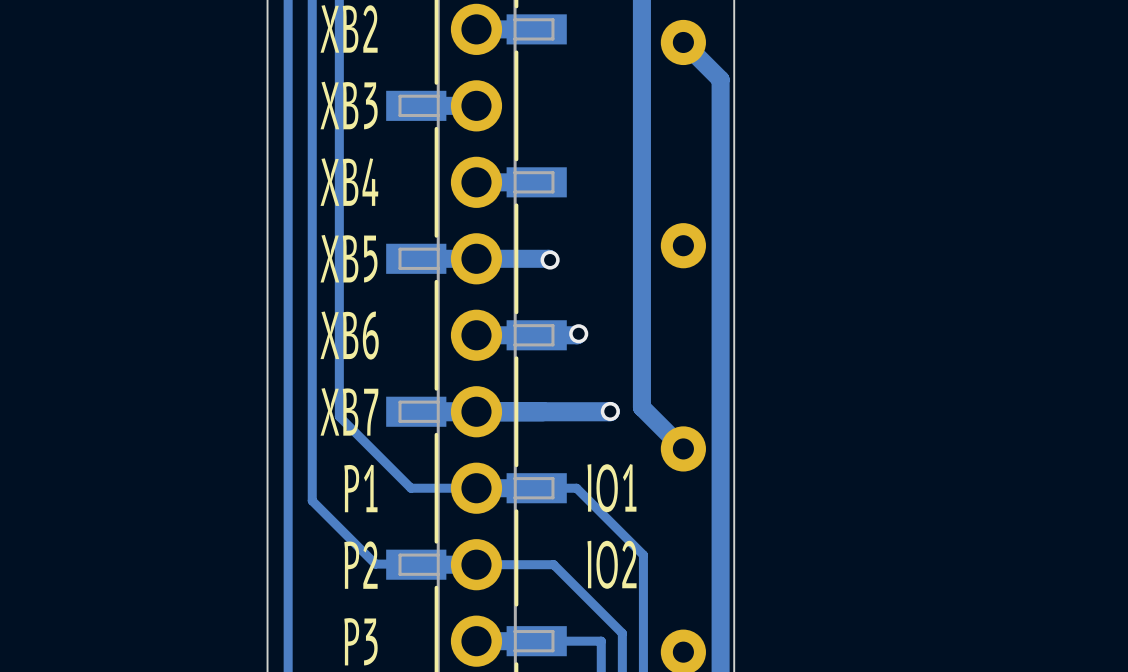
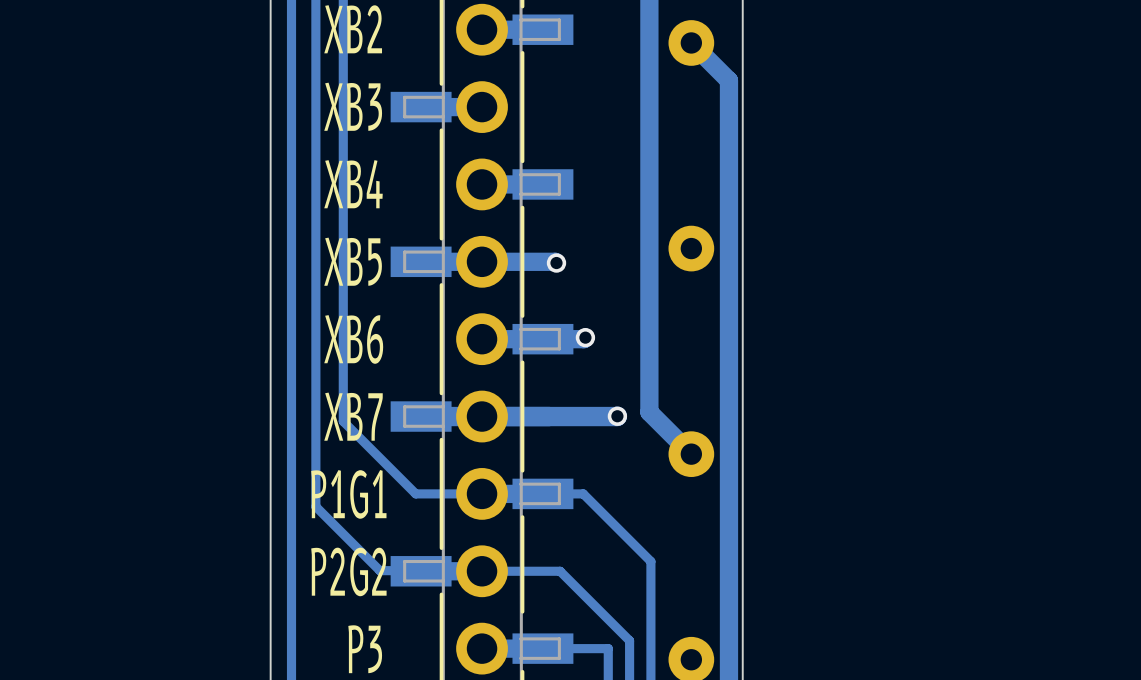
text: P1 (360, 488) -> P1G1 (348, 494)
text: IO1 (611, 488) -> none
text: IO2 (612, 564) -> none
text: P2 (360, 565) -> P2G2 (348, 571)

